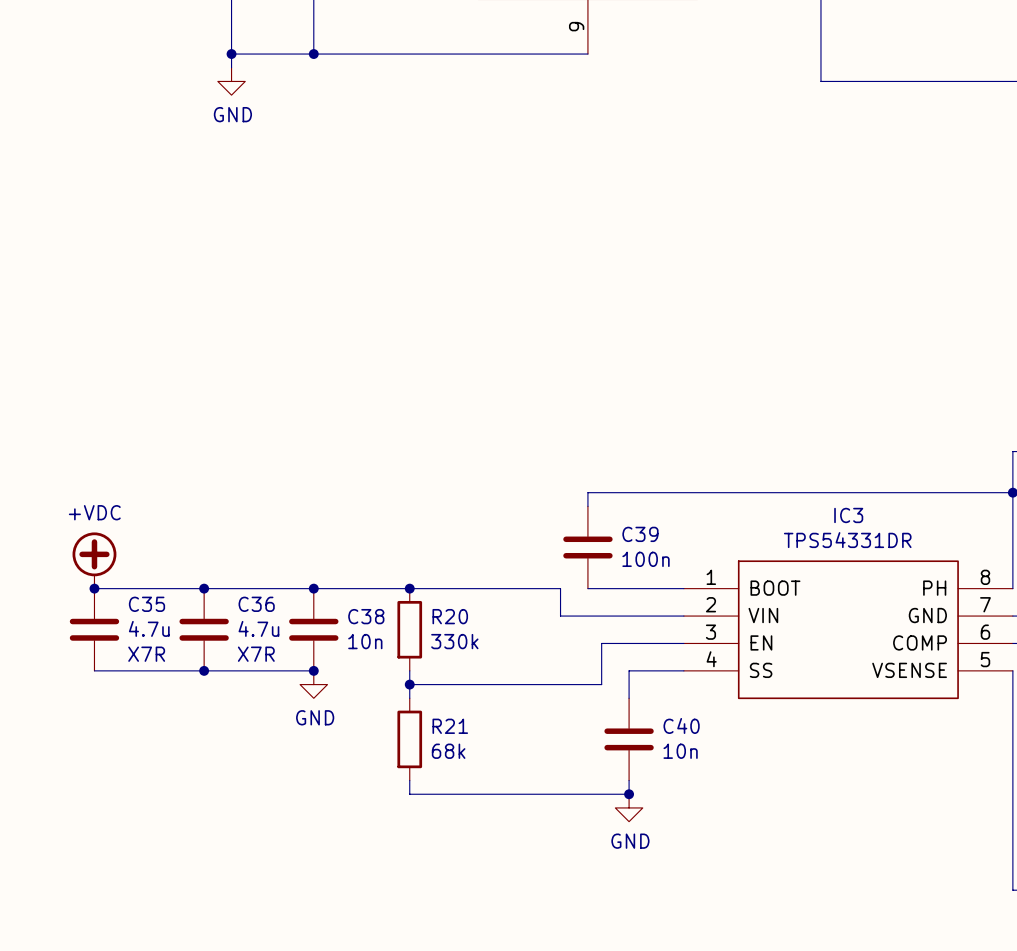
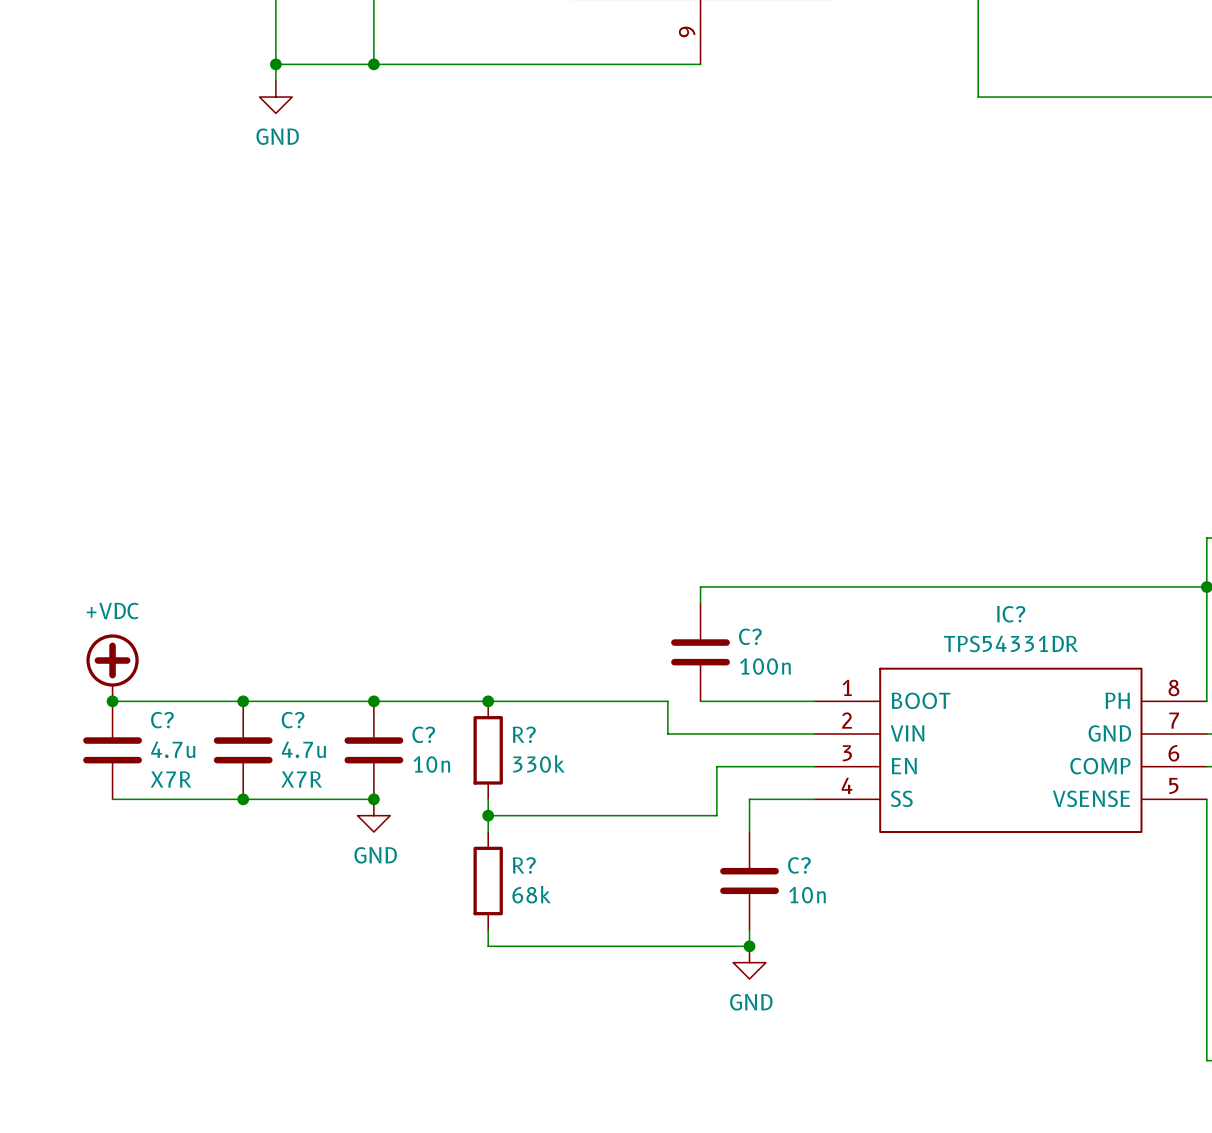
IC3 name: IC3 (848, 515) -> IC? (1011, 614)
C39 name: C39 (640, 534) -> C? (750, 636)
C35 name: C35 (146, 604) -> C? (162, 720)
C36 name: C36 (256, 604) -> C? (293, 720)
C38 name: C38 (366, 616) -> C? (423, 734)
R20 name: R20 (450, 616) -> R? (524, 734)
C40 name: C40 (681, 725) -> C? (799, 865)
R21 name: R21 (450, 726) -> R? (524, 865)

